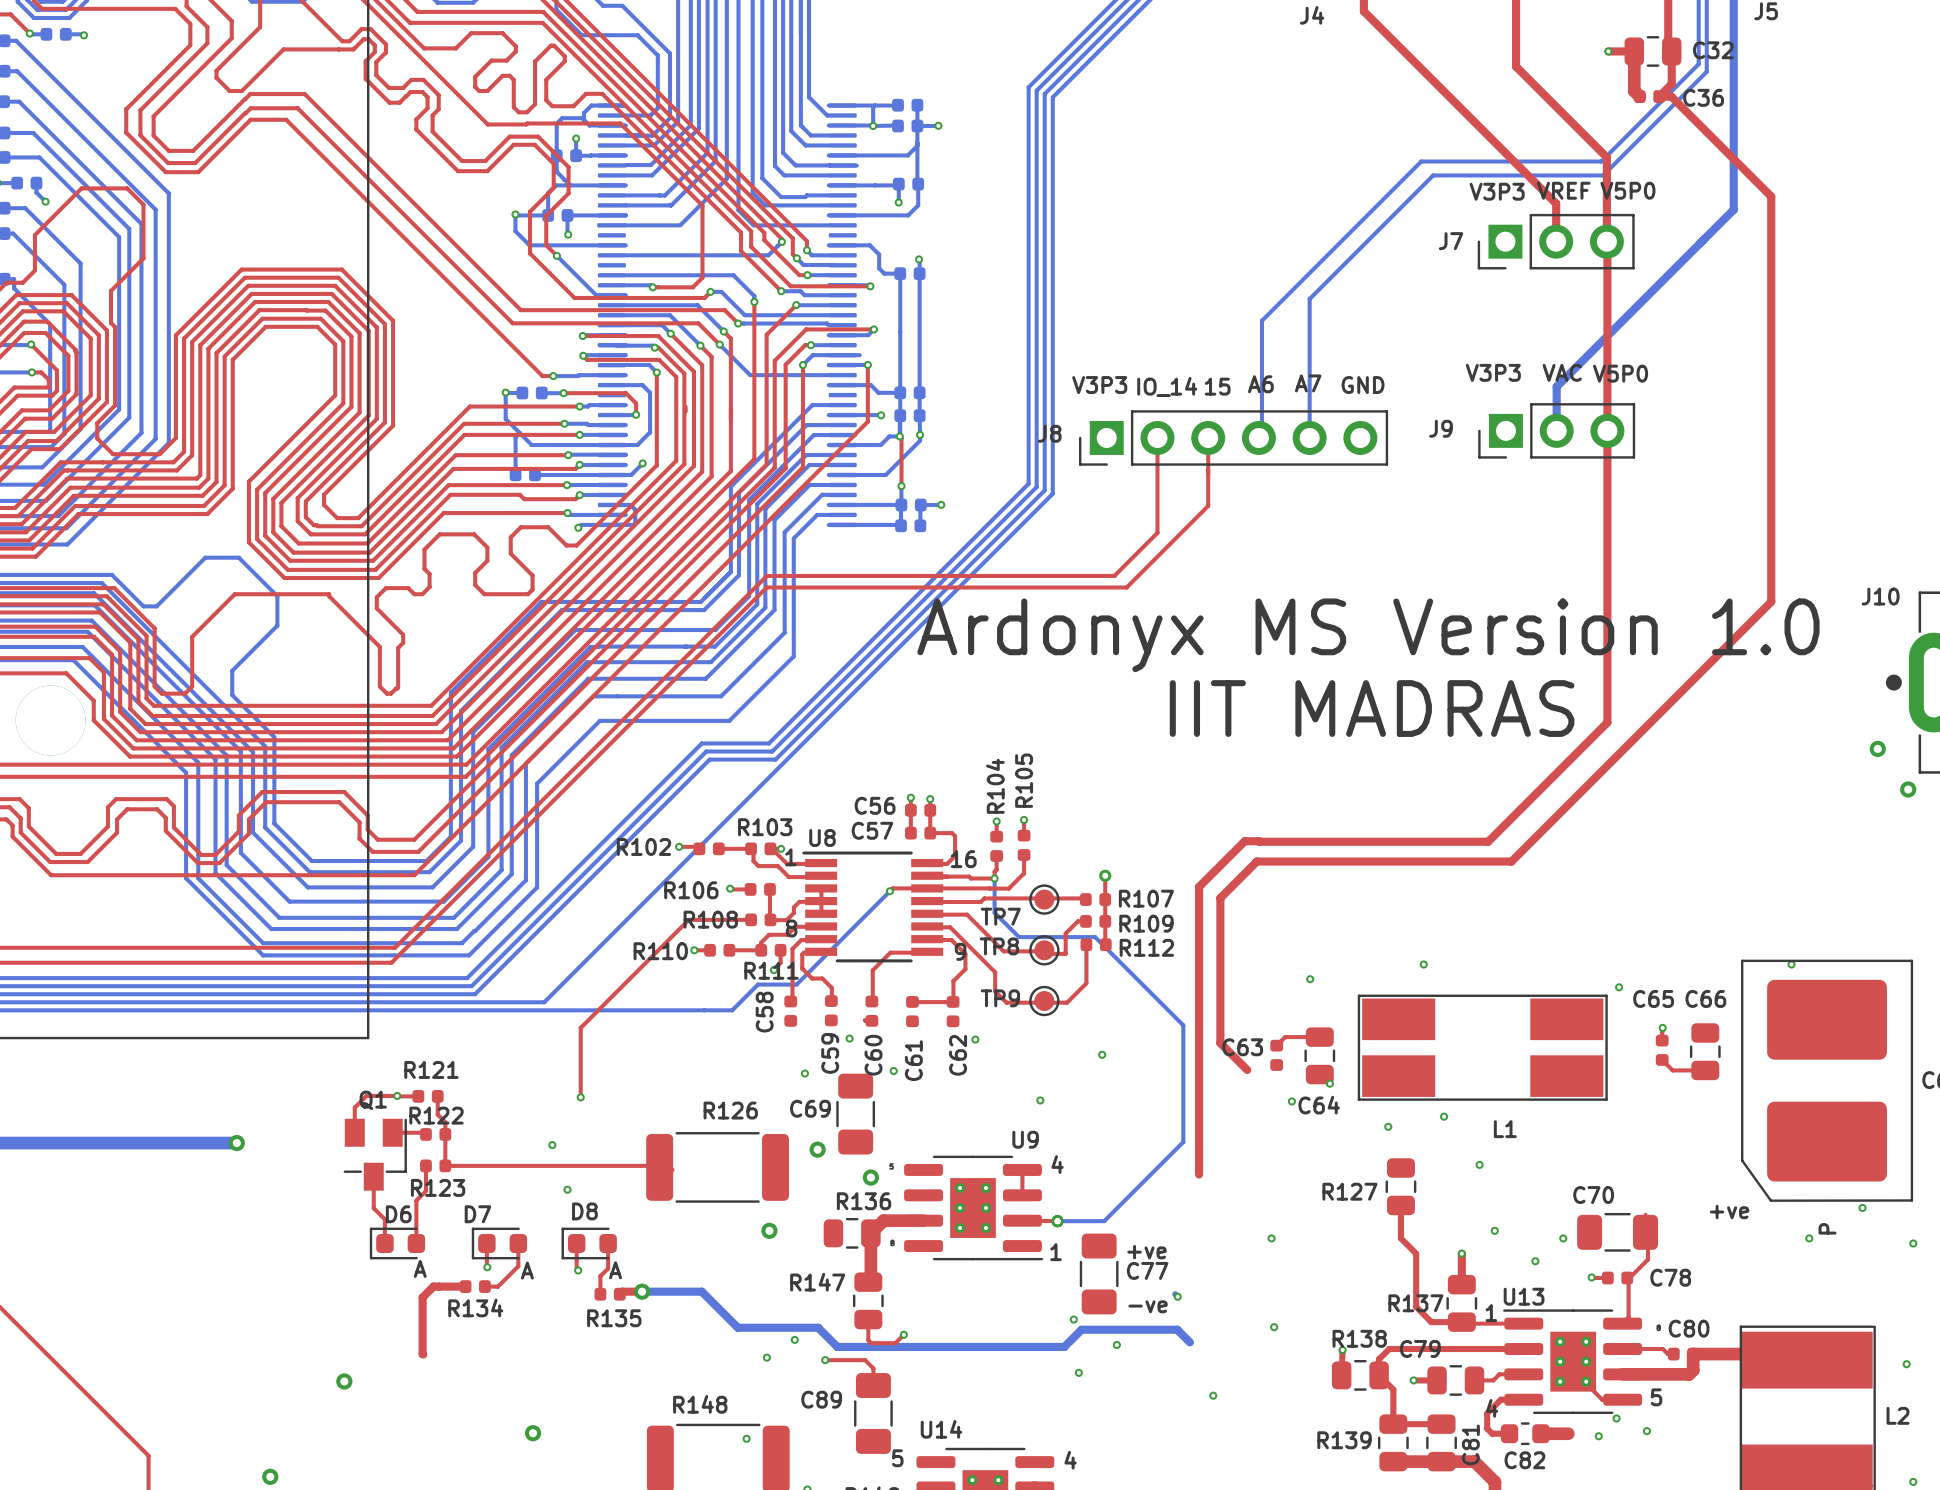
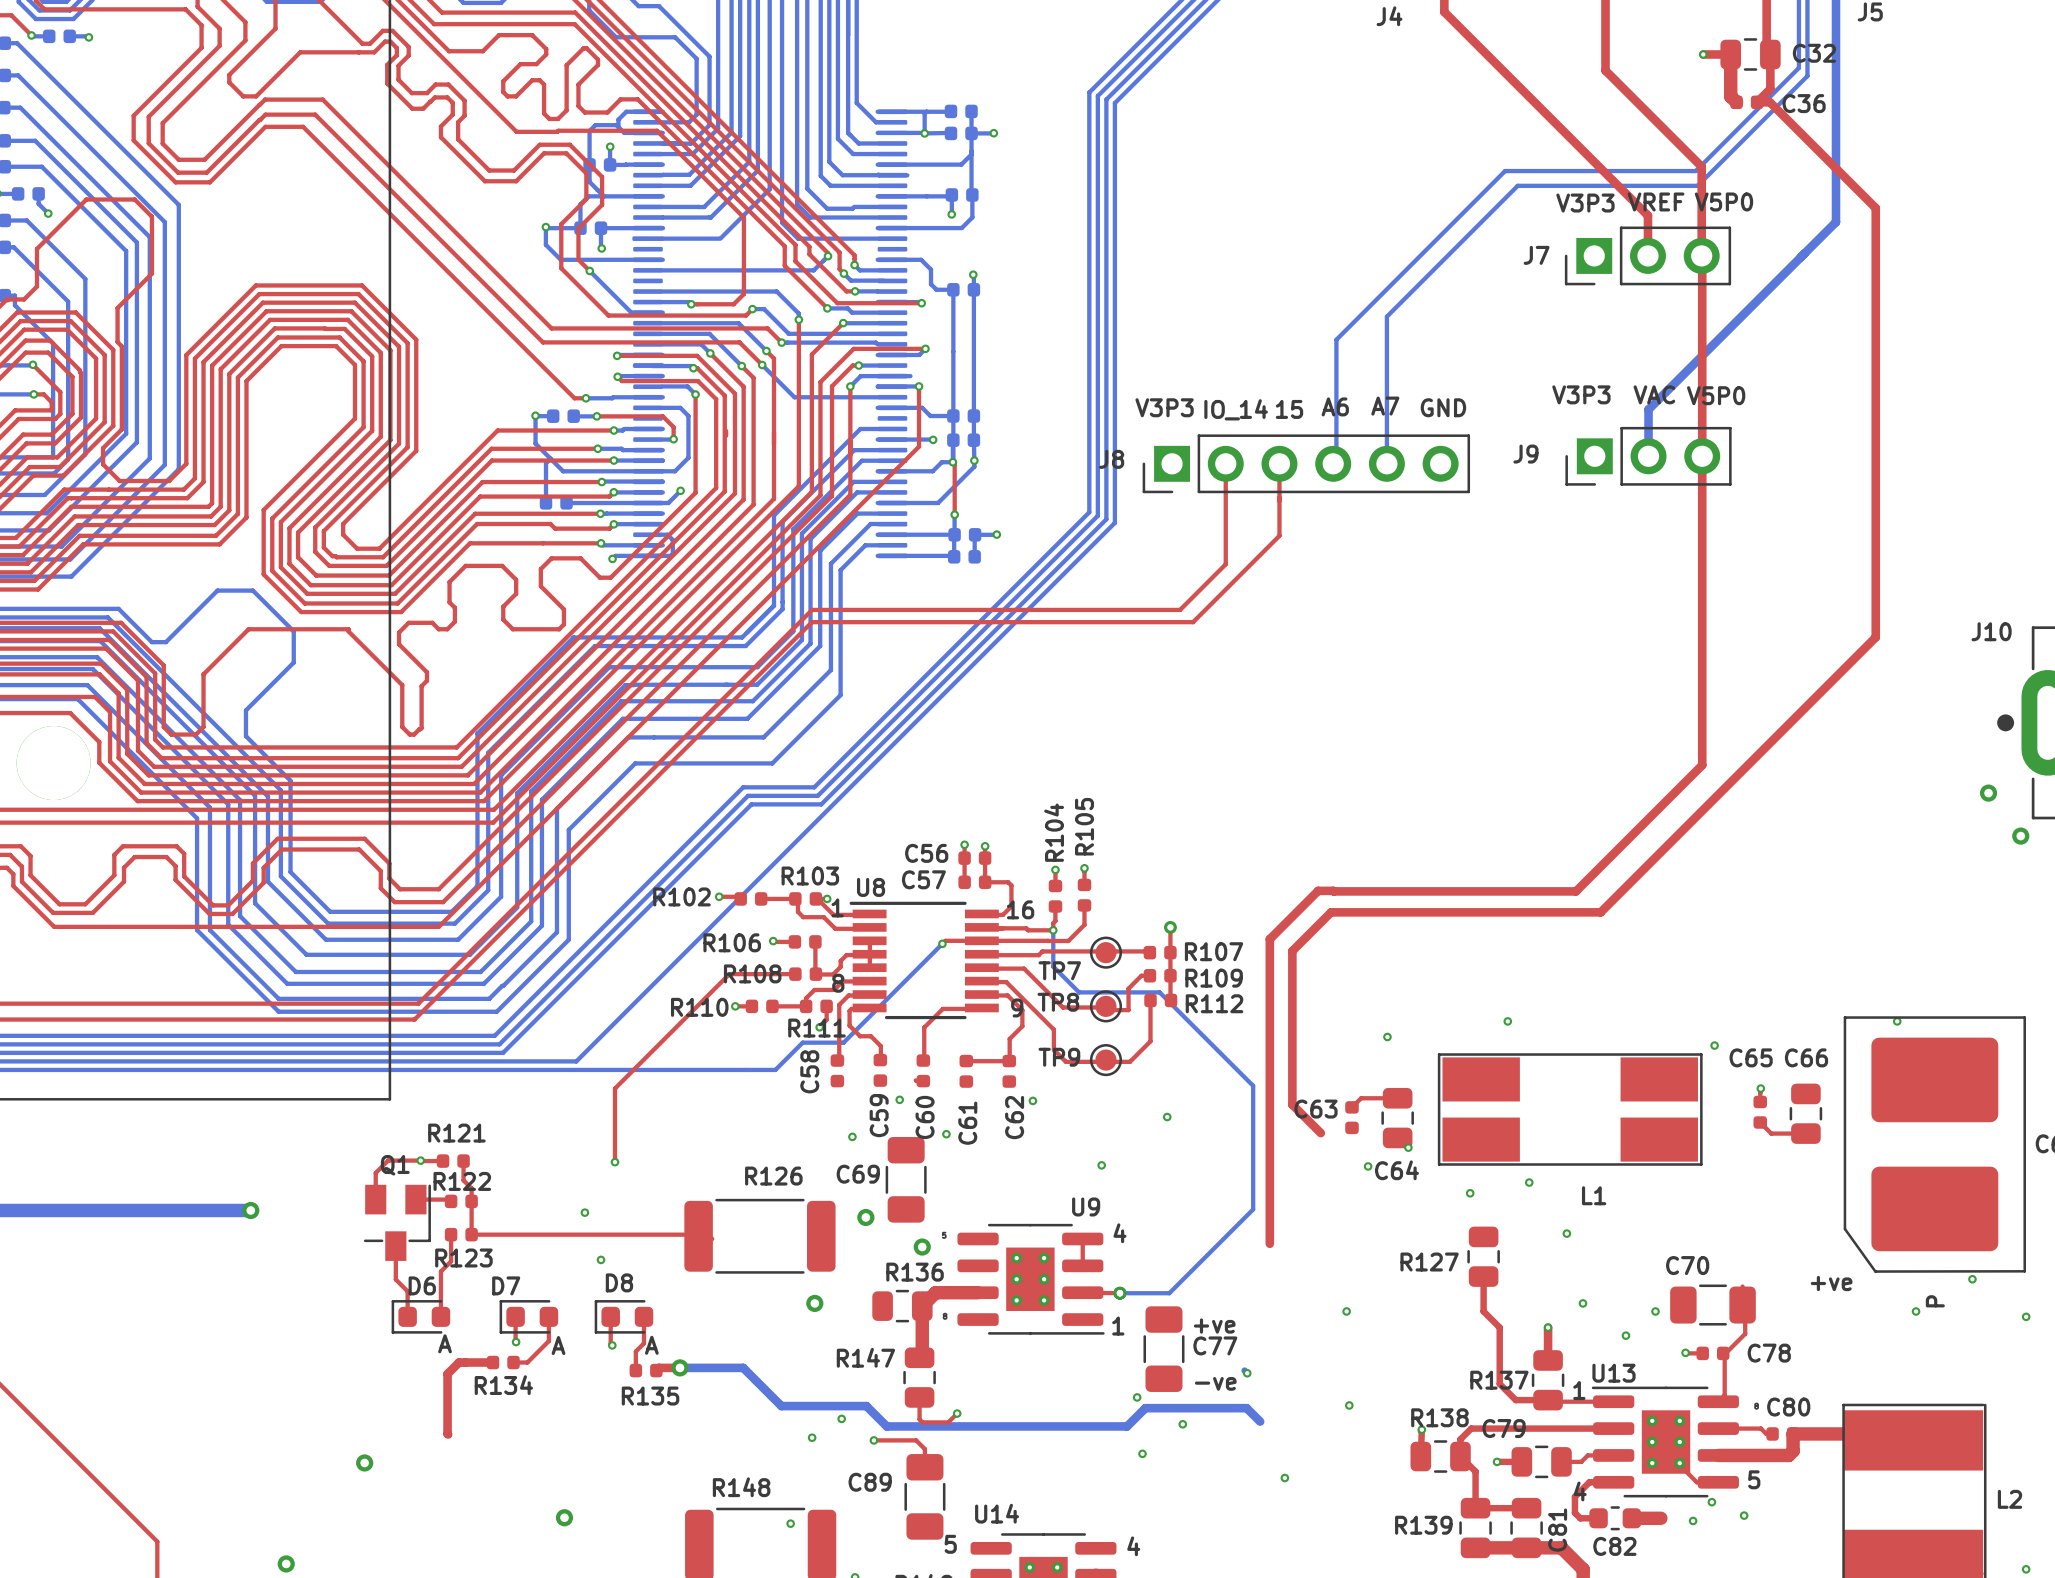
text: Ardonyx MS Version 1.0 (1368, 635) -> none
text: IIT MADRAS (1372, 708) -> none
via: (1906, 1364) -> none

